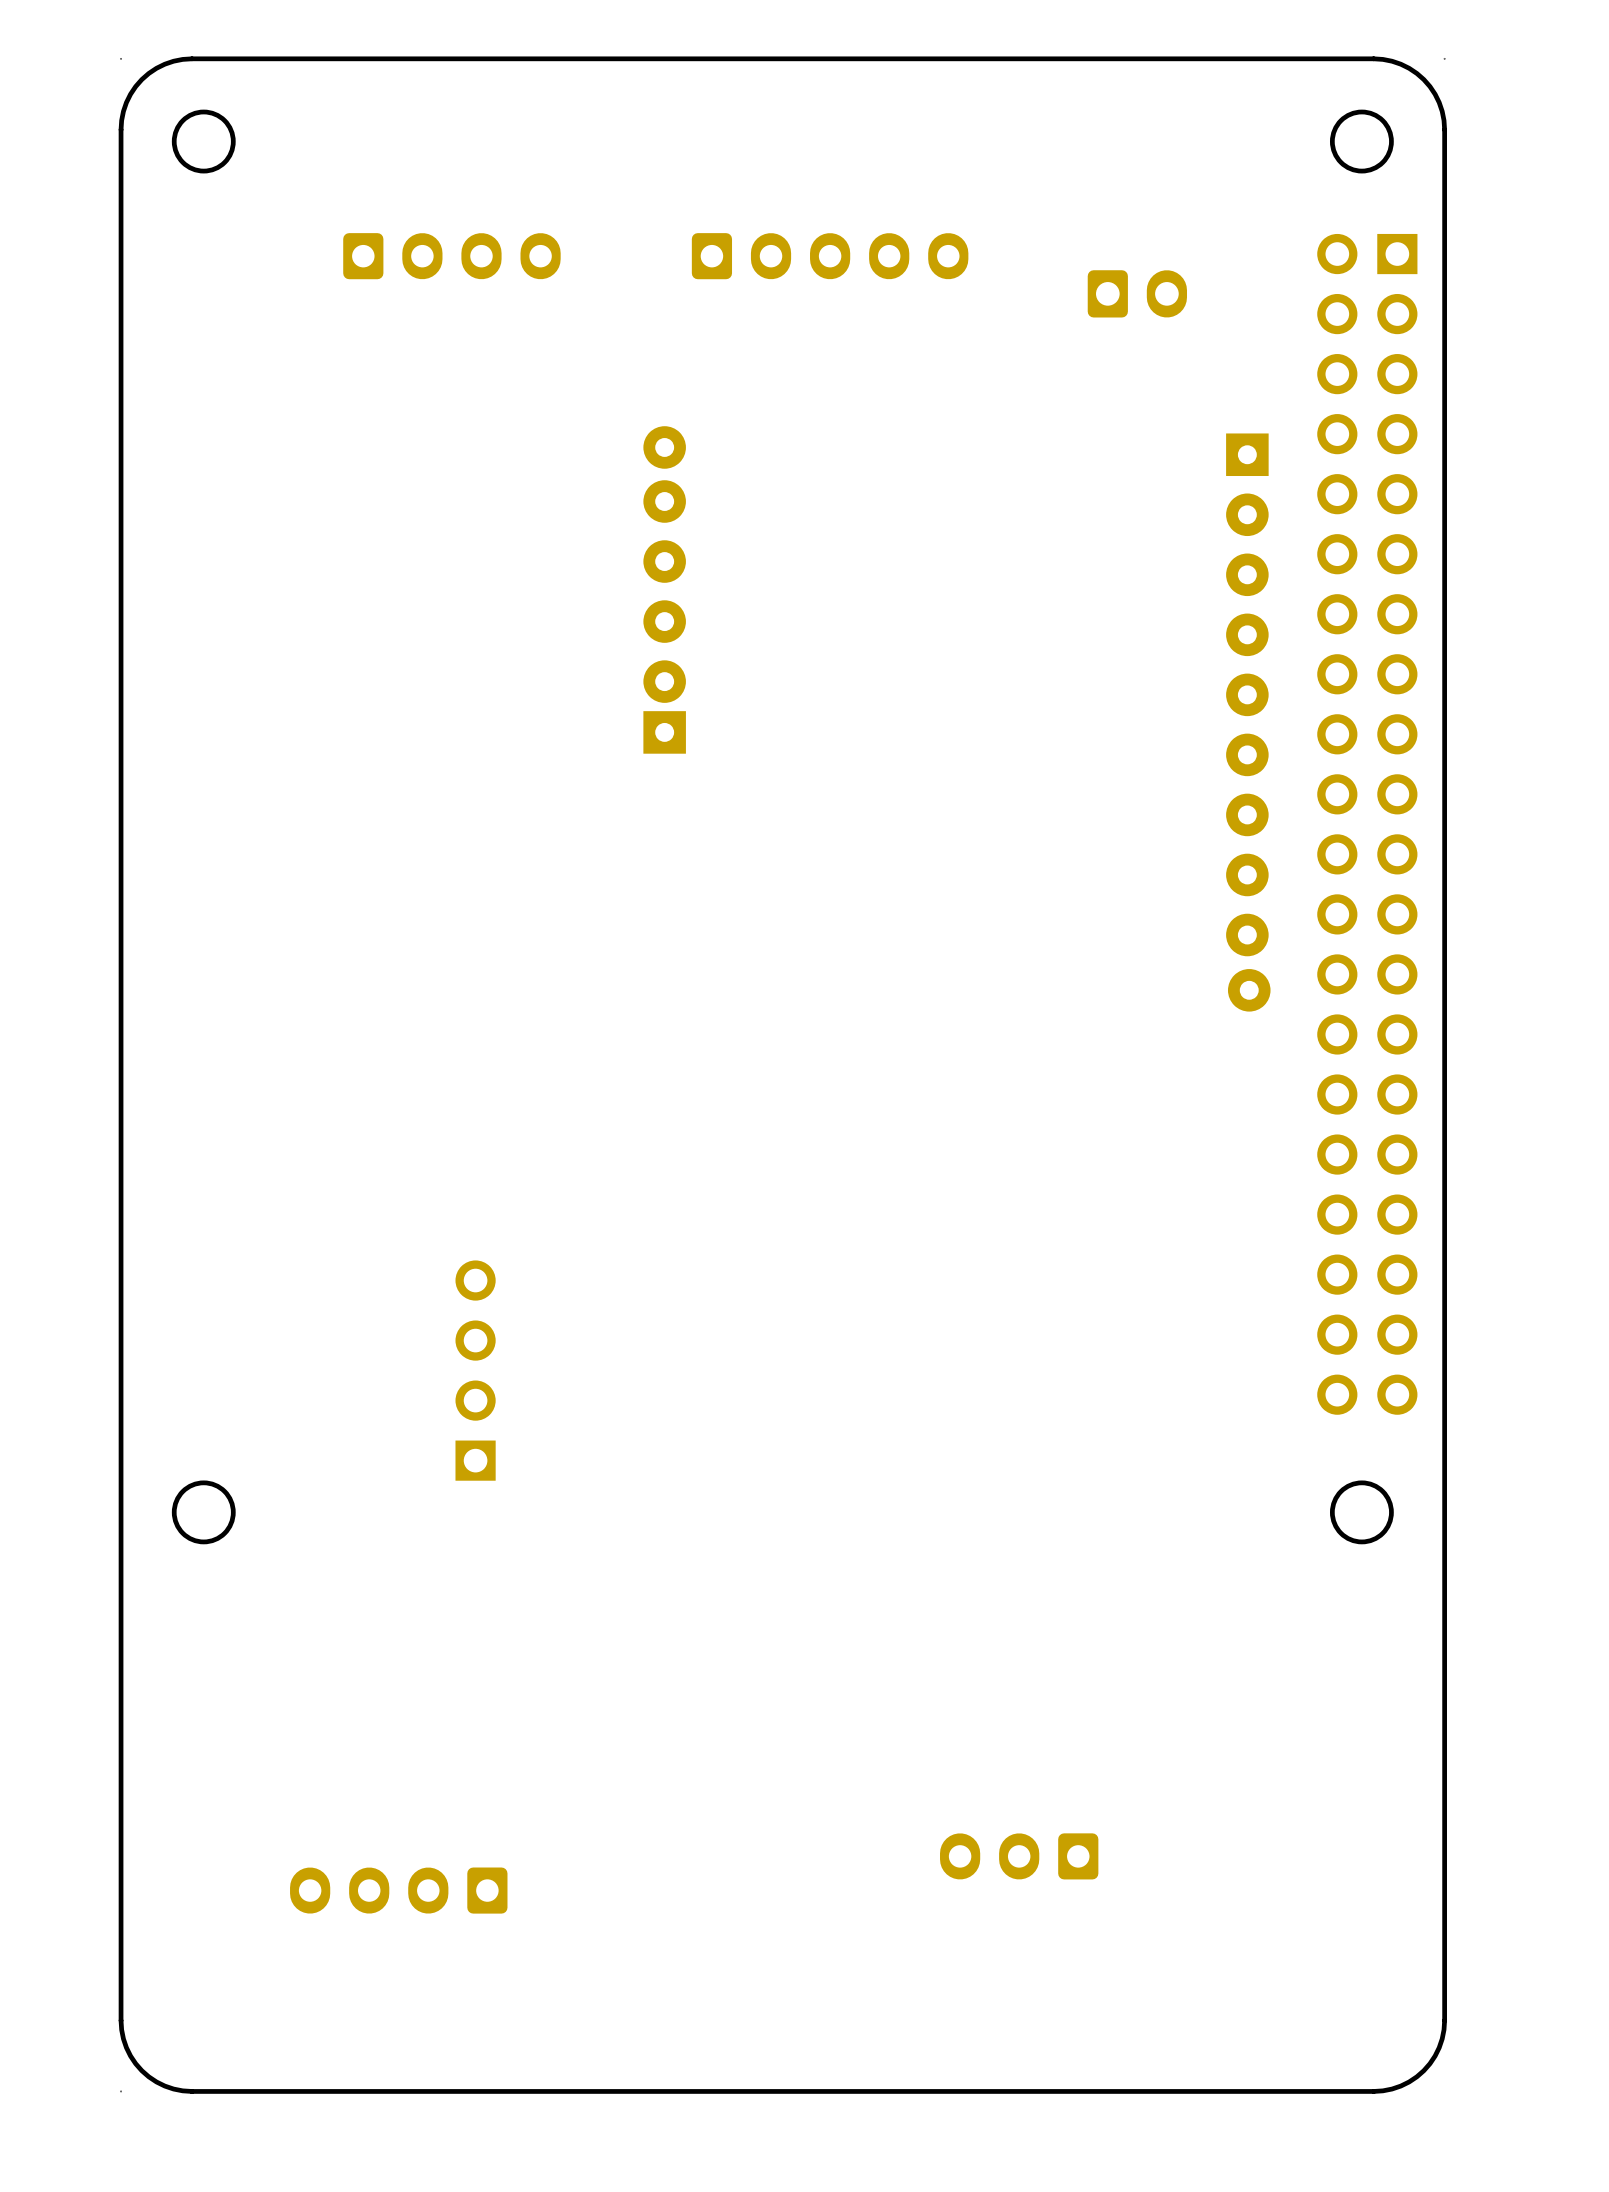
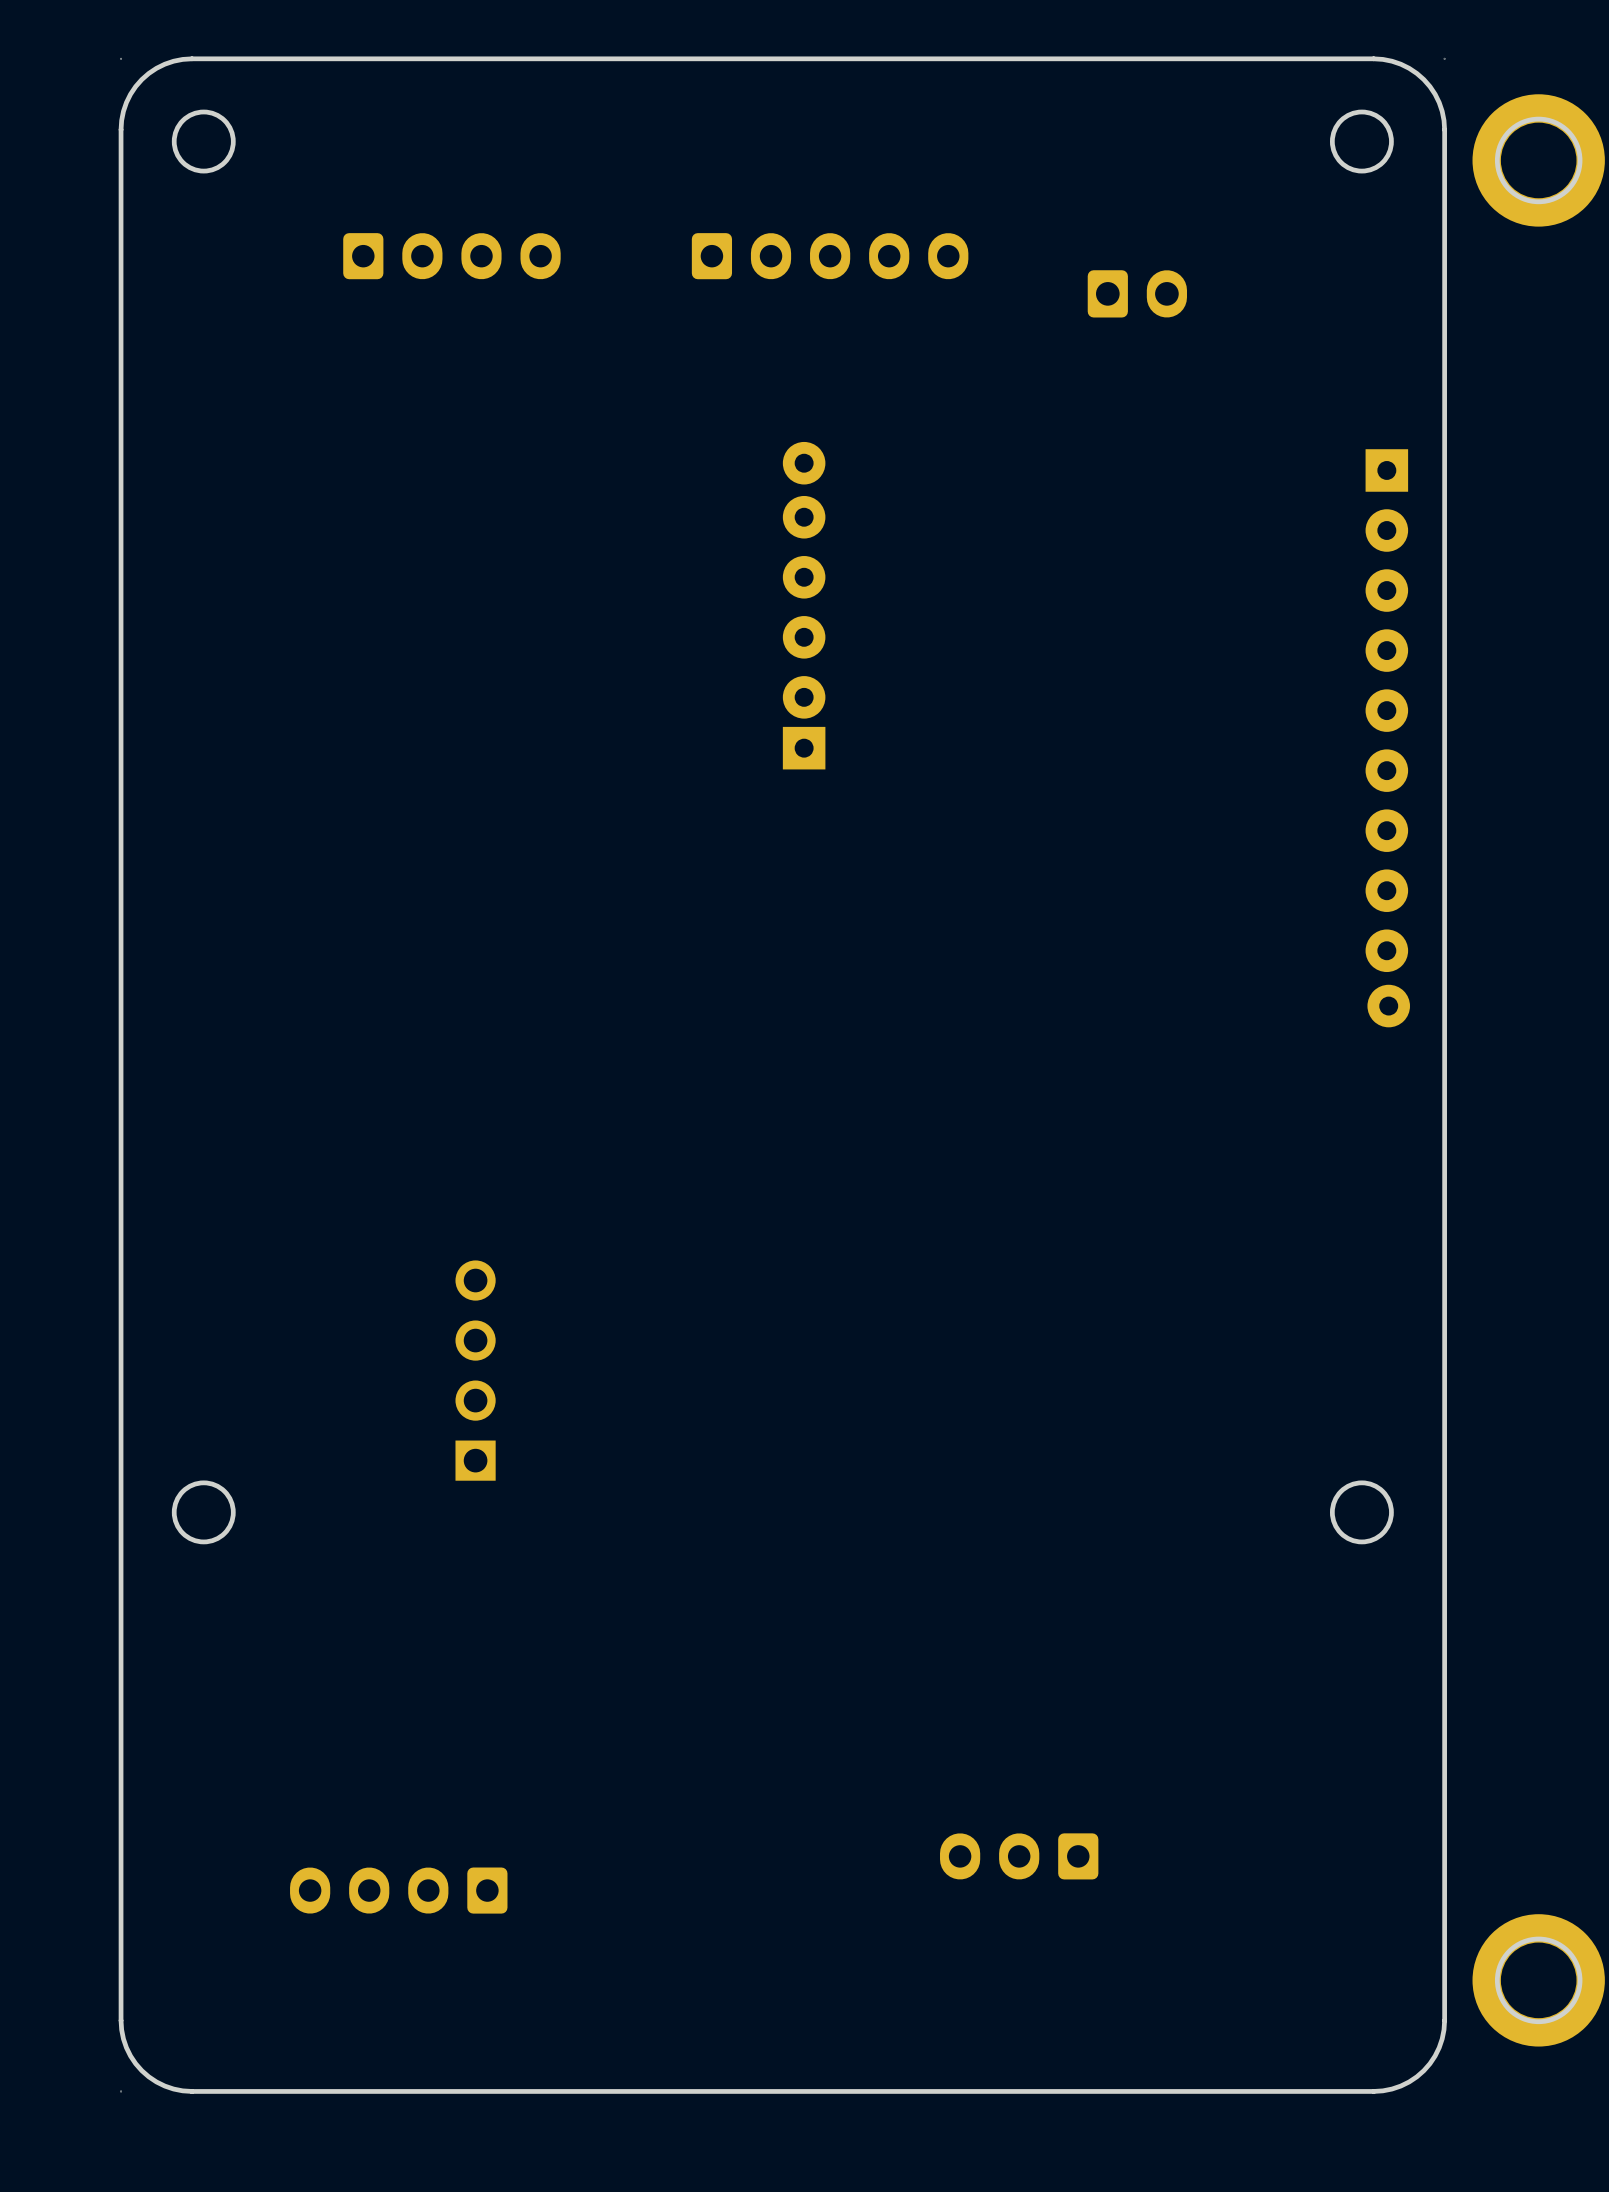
round board edge: none -> [1494, 116, 1583, 205]
part: none -> (1538, 160)
part position: (664, 589) -> (804, 605)
part position: (1248, 722) -> (1387, 738)
part: (1367, 824) -> none
round board edge: none -> [1494, 1936, 1583, 2025]
part: none -> (1538, 1980)

